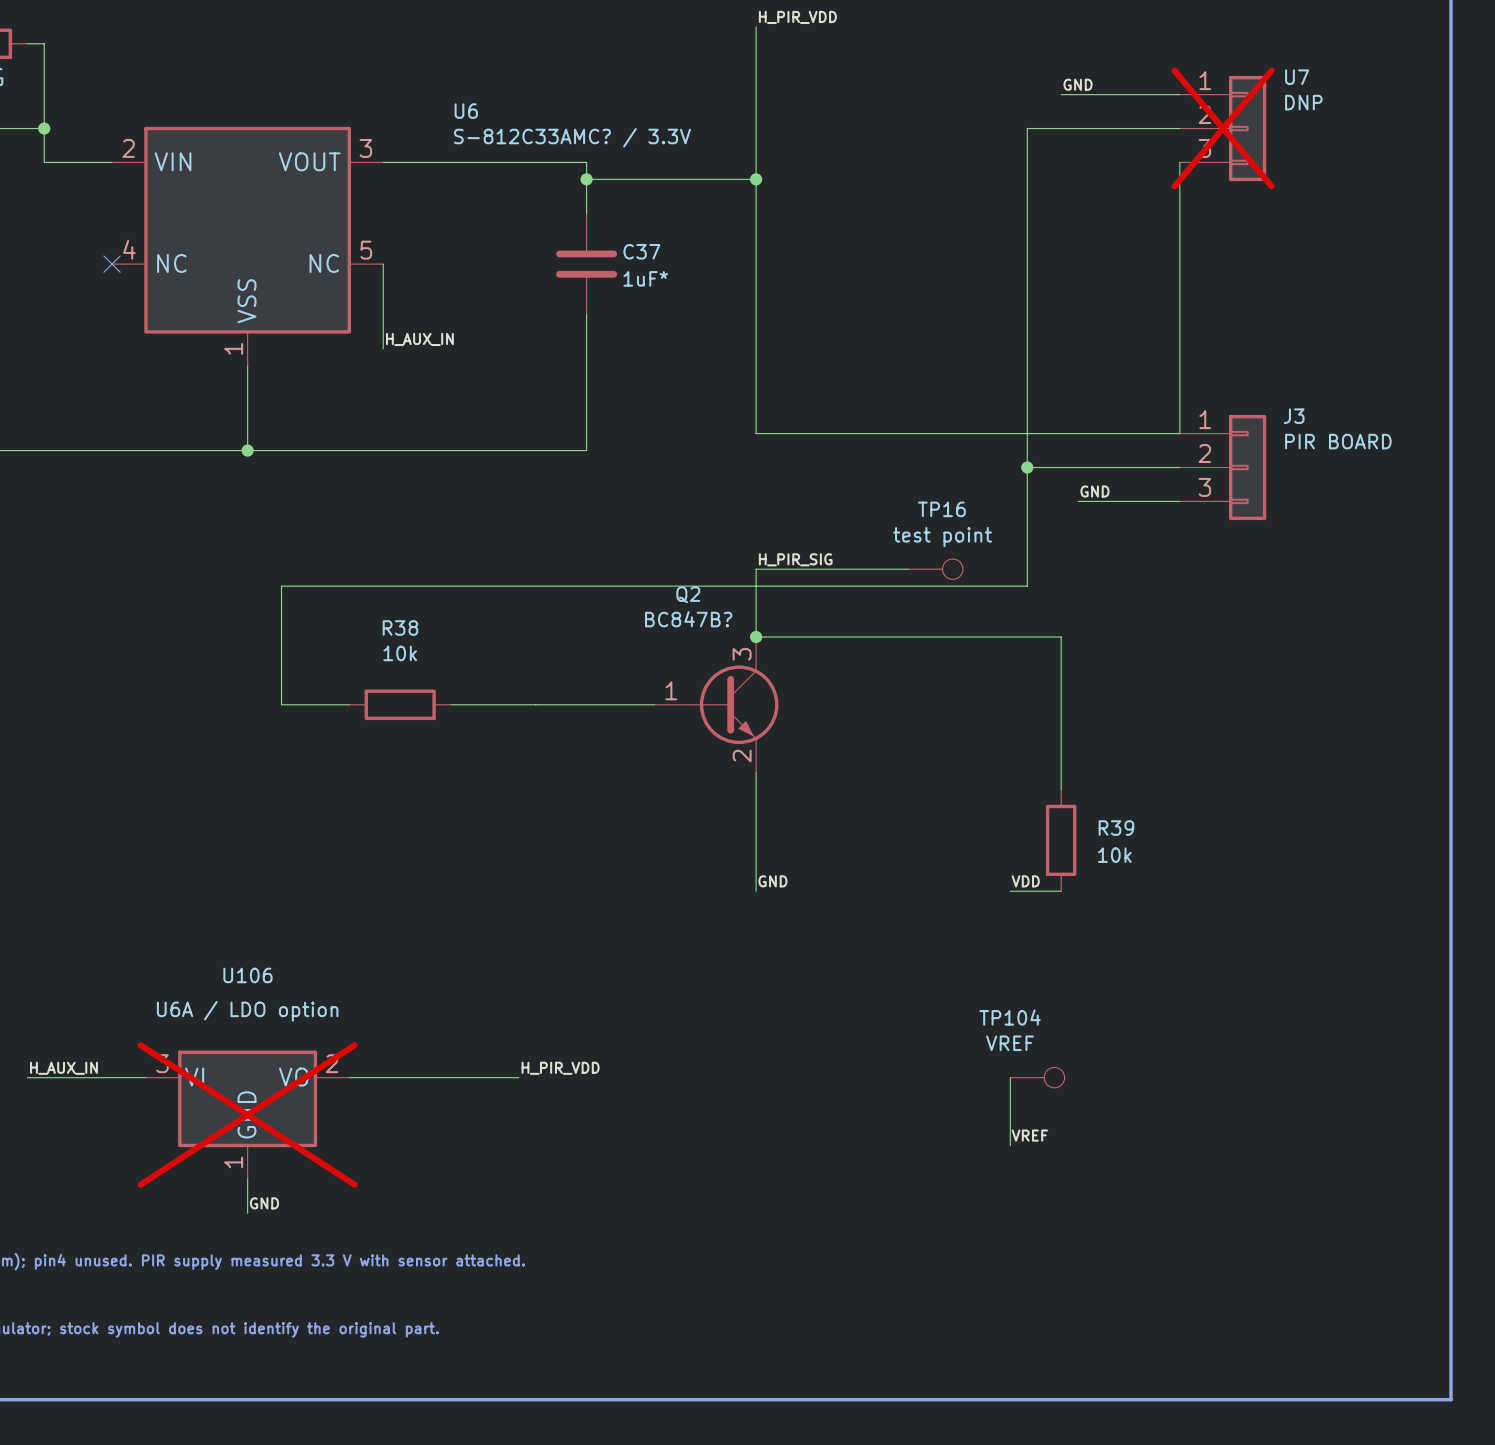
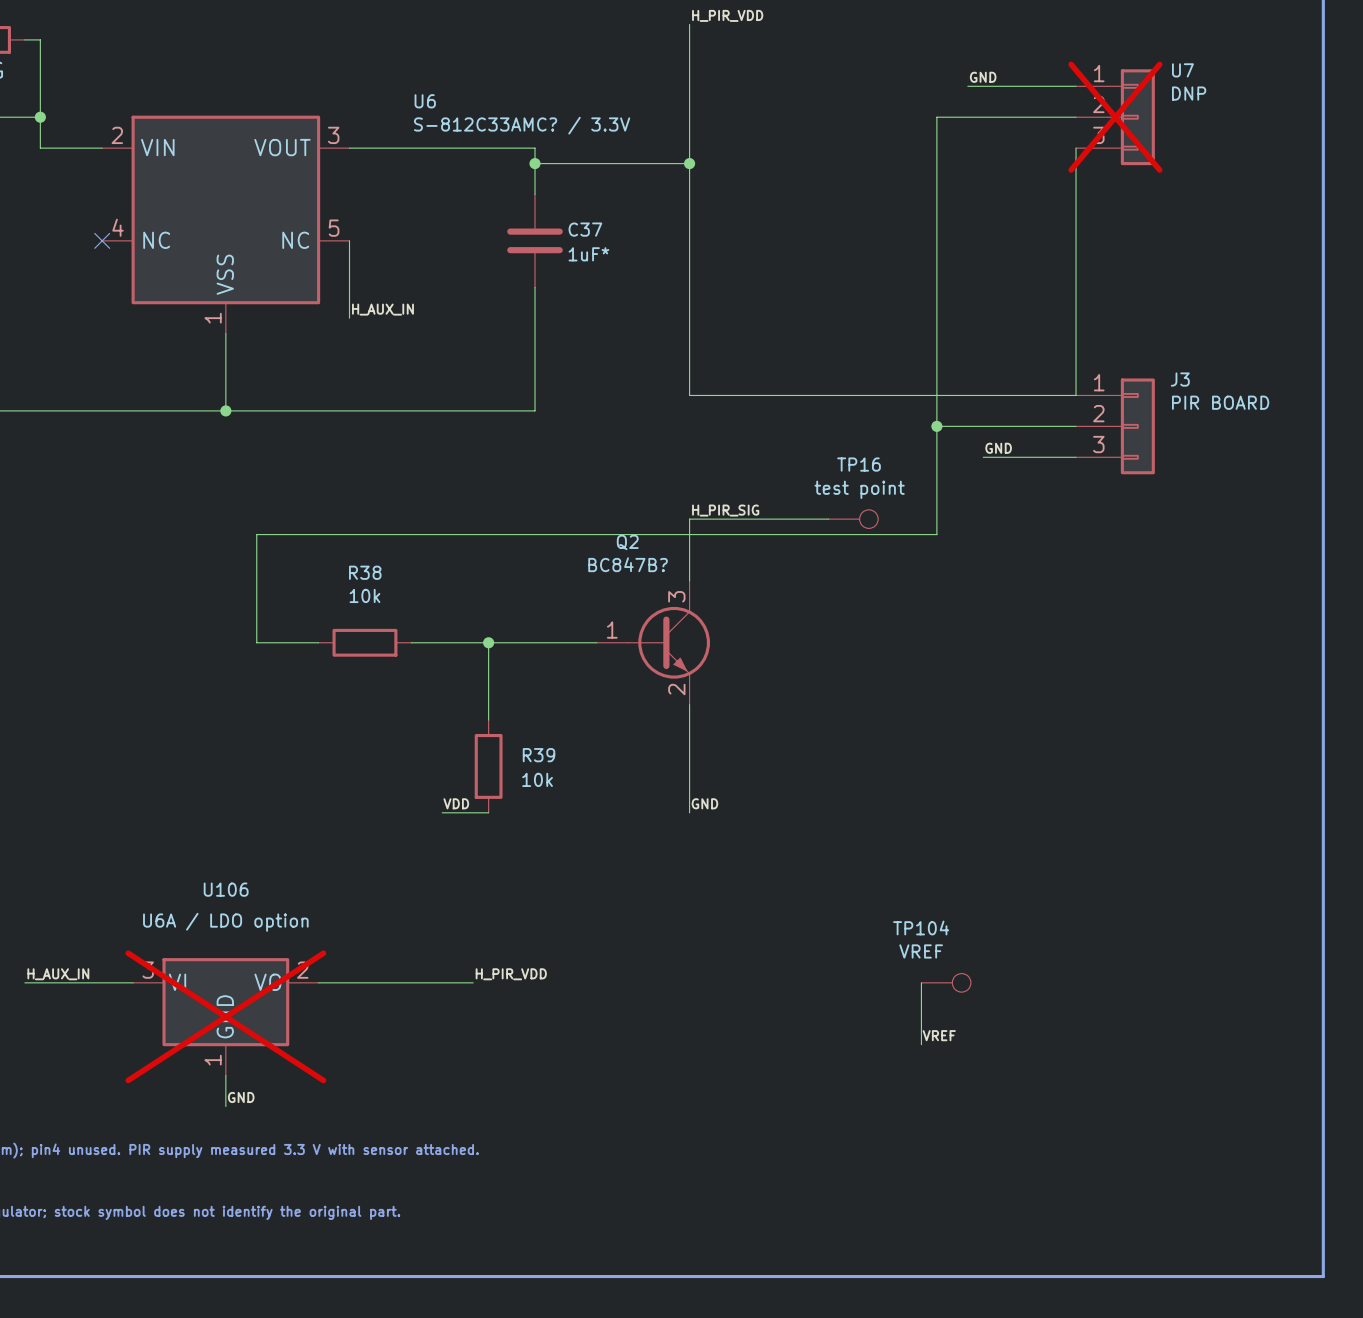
wire: (756, 636) (1061, 636) (1061, 789) -> none
junction: (756, 636) -> none
wire: none -> (488, 642) (488, 720)
junction: none -> (488, 642)
R39 position: (1061, 840) -> (488, 766)
label: none -> VDD (456, 803)
label: VDD (1025, 881) -> none
wire: none -> (442, 812) (488, 812)
wire: (1010, 891) (1061, 891) -> none

